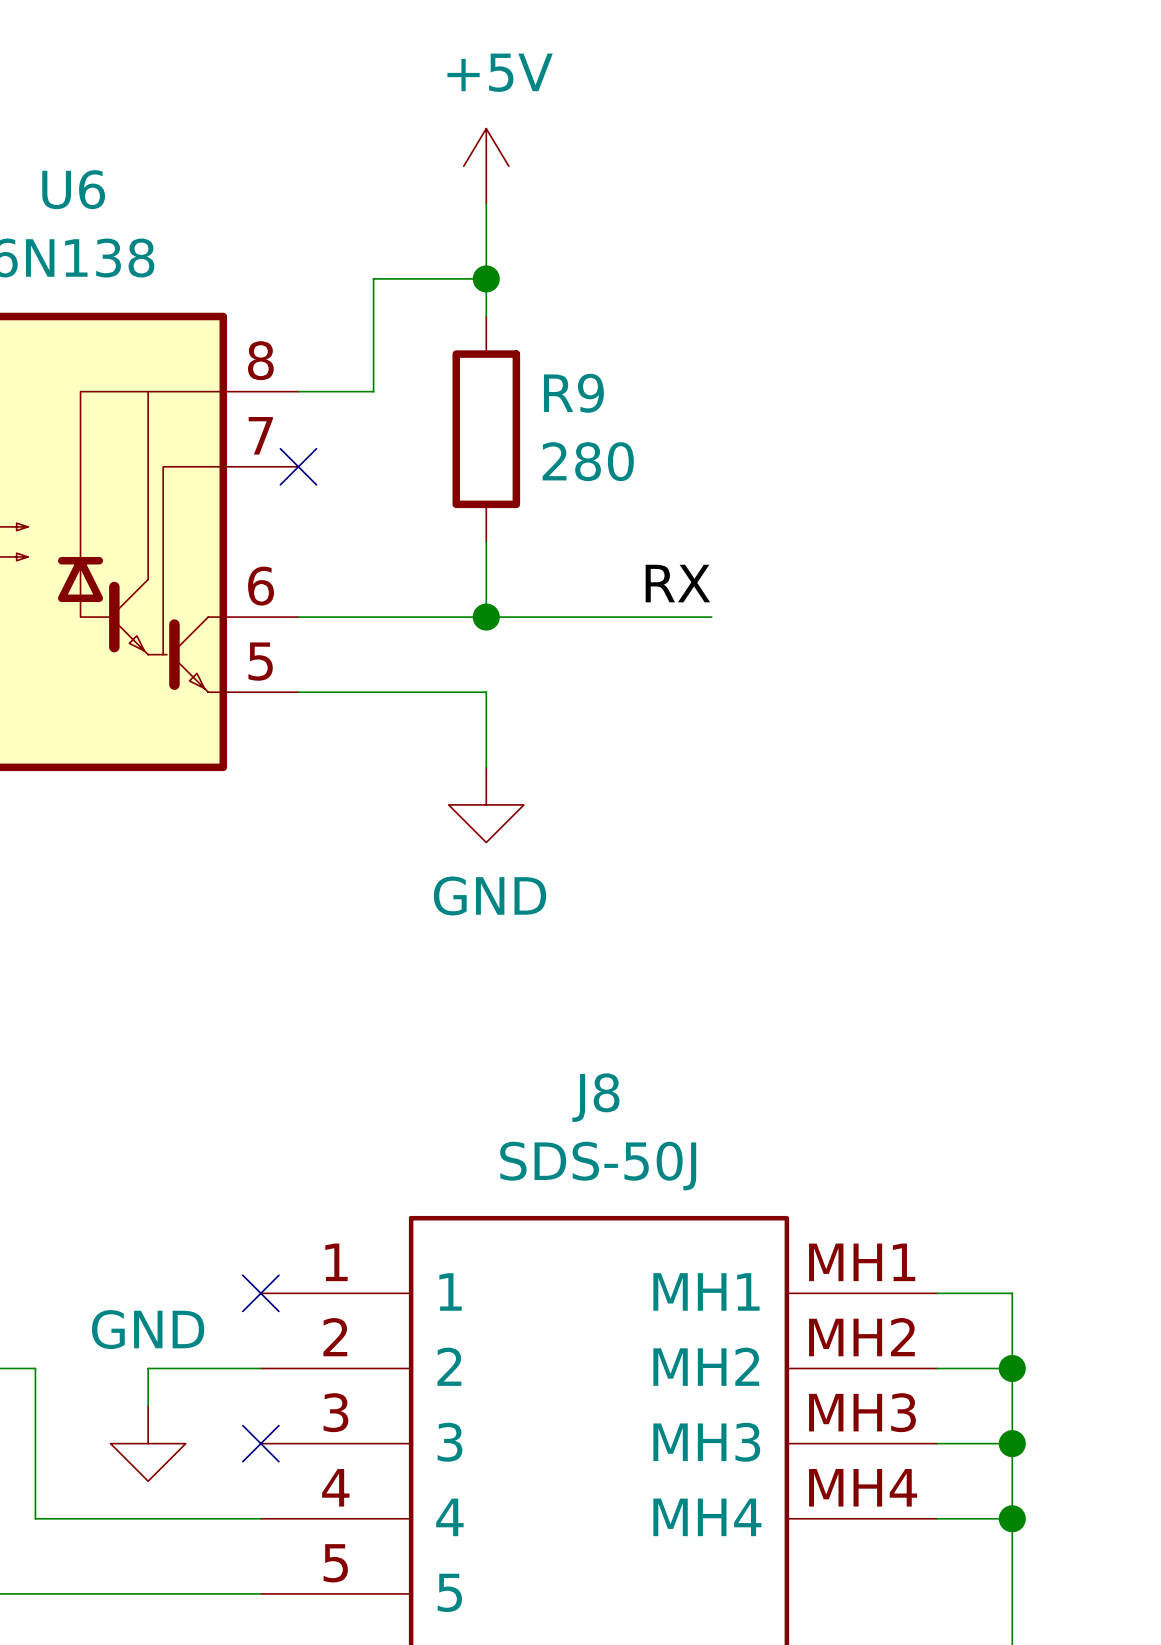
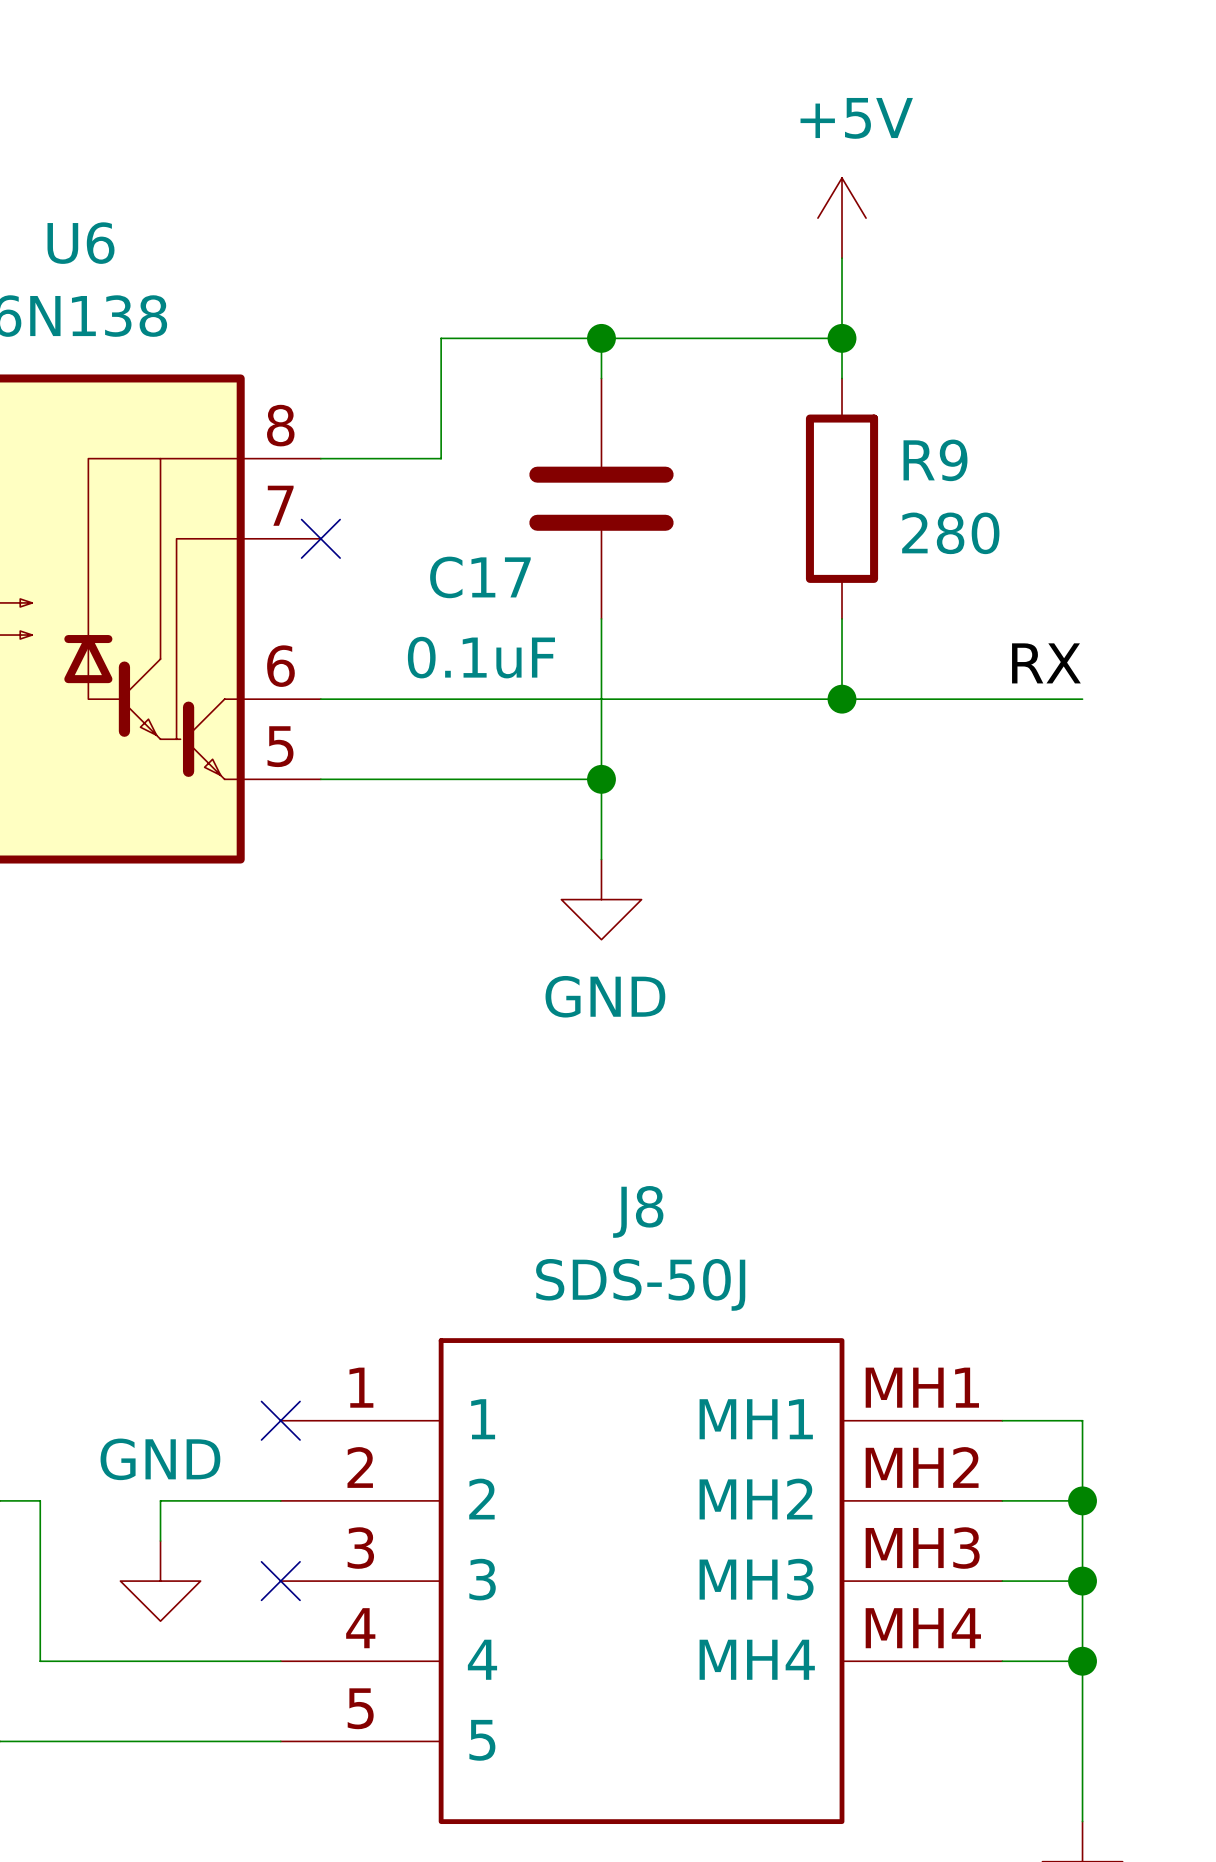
power symbol position: +5V (486, 166) -> +5V (842, 218)
wire: (486, 203) (486, 316) -> (842, 258) (842, 378)
wire: (411, 278) (373, 278) (373, 391) -> (441, 338) (441, 458) (401, 458)
wire: none -> (521, 338) (842, 338)
junction position: (486, 278) -> (601, 338)
wire: none -> (601, 338) (601, 378)
junction: none -> (842, 338)
R9 position: (486, 429) -> (842, 498)
C17: none -> 0.1uF (601, 498)
wire: (486, 541) (486, 617) -> (842, 618) (842, 699)
wire: none -> (601, 618) (601, 859)
label position: RX (677, 583) -> RX (1046, 663)
junction position: (486, 617) -> (601, 779)
wire: none -> (761, 699) (1082, 699)
junction: none -> (842, 699)
wire: (486, 692) (486, 767) -> (521, 779) (601, 779)
power symbol position: GND (486, 804) -> GND (601, 899)

